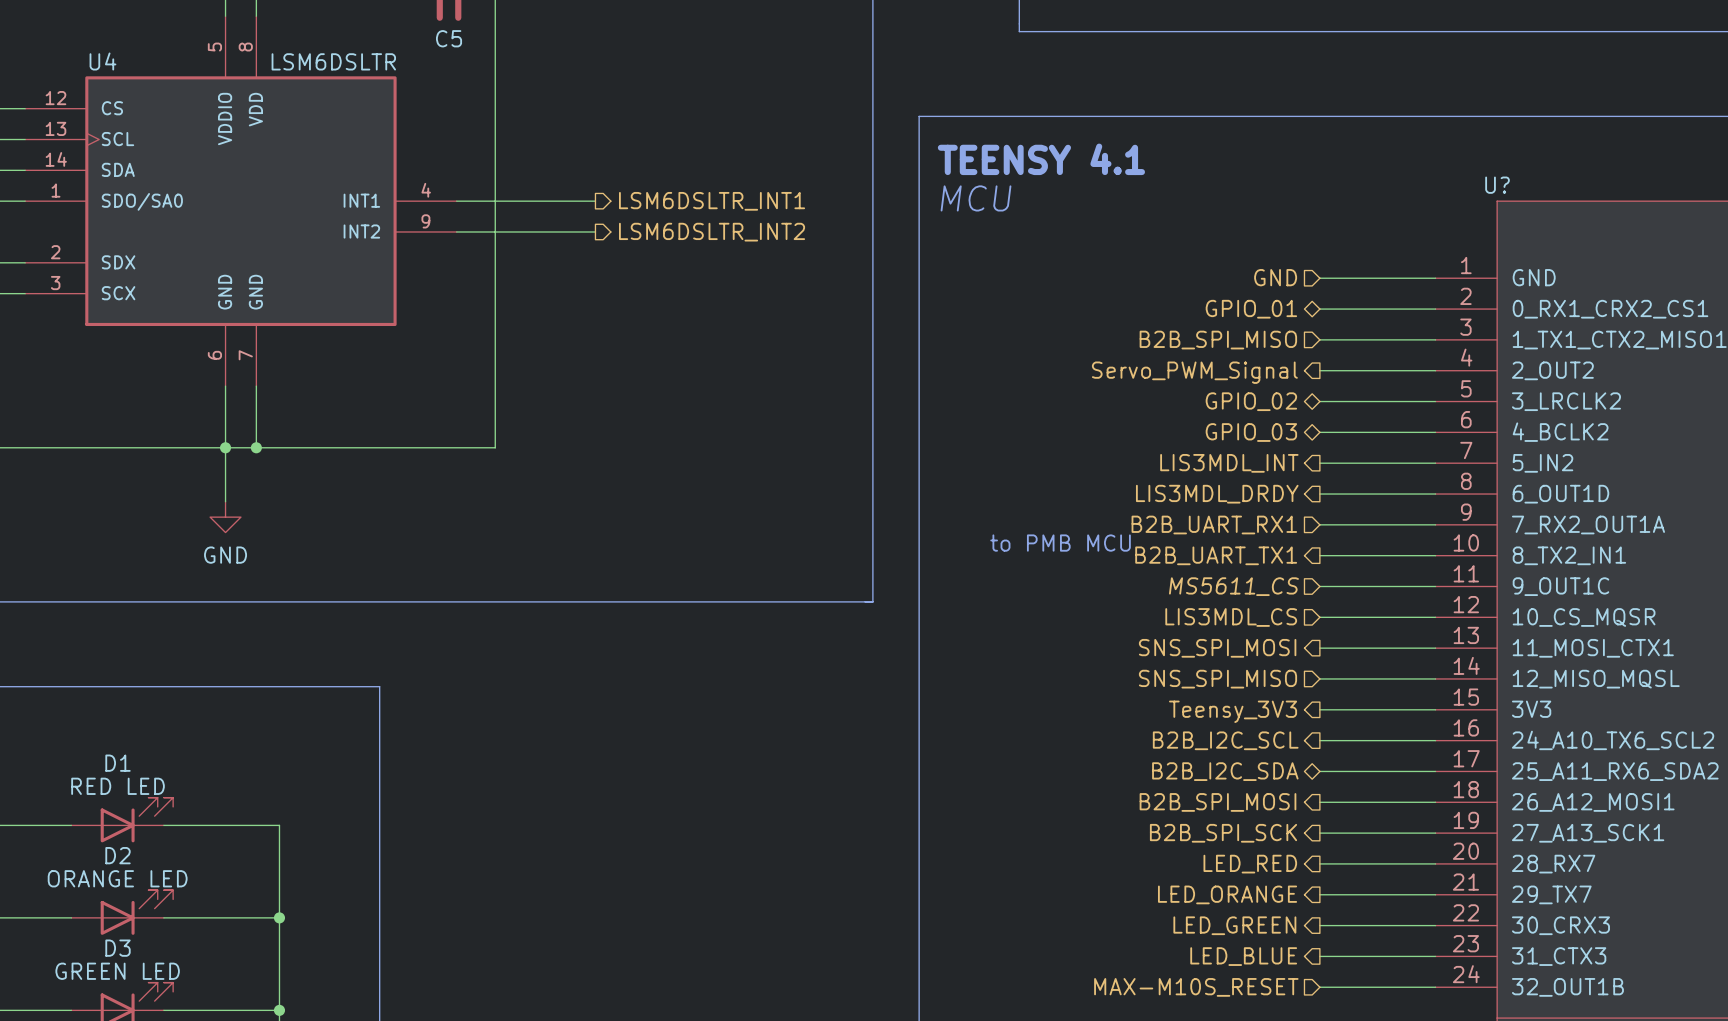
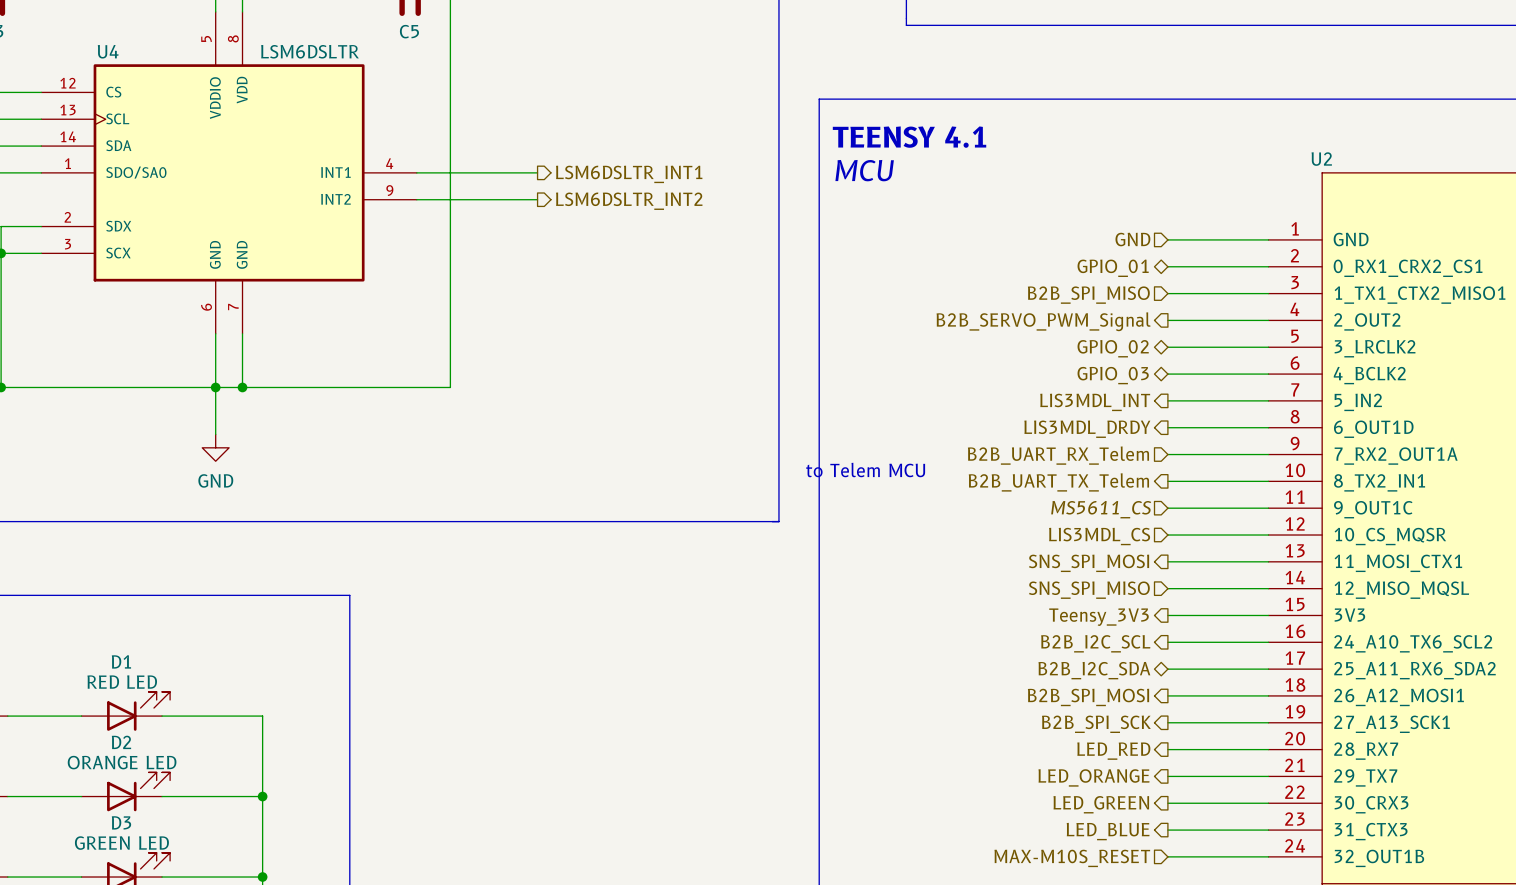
U? name: U? (1497, 185) -> U2 (1321, 159)
hierarchical label: Servo_PWM_Signal (1194, 372) -> B2B_SERVO_PWM_Signal (1043, 321)
hierarchical label: B2B_UART_RX1 (1214, 525) -> B2B_UART_RX_Telem (1058, 455)
text: to PMB MCU (1060, 543) -> to Telem MCU (865, 470)
hierarchical label: B2B_UART_TX1 (1216, 555) -> B2B_UART_TX_Telem (1058, 482)

